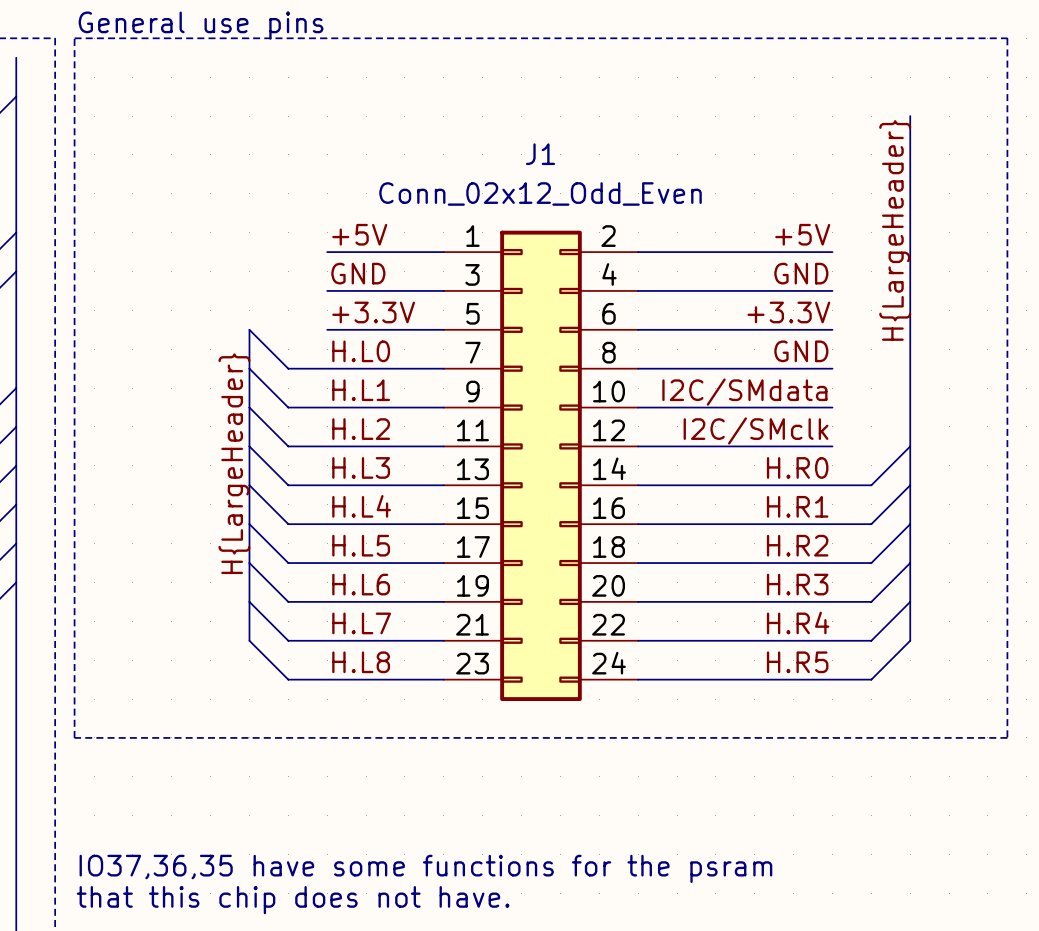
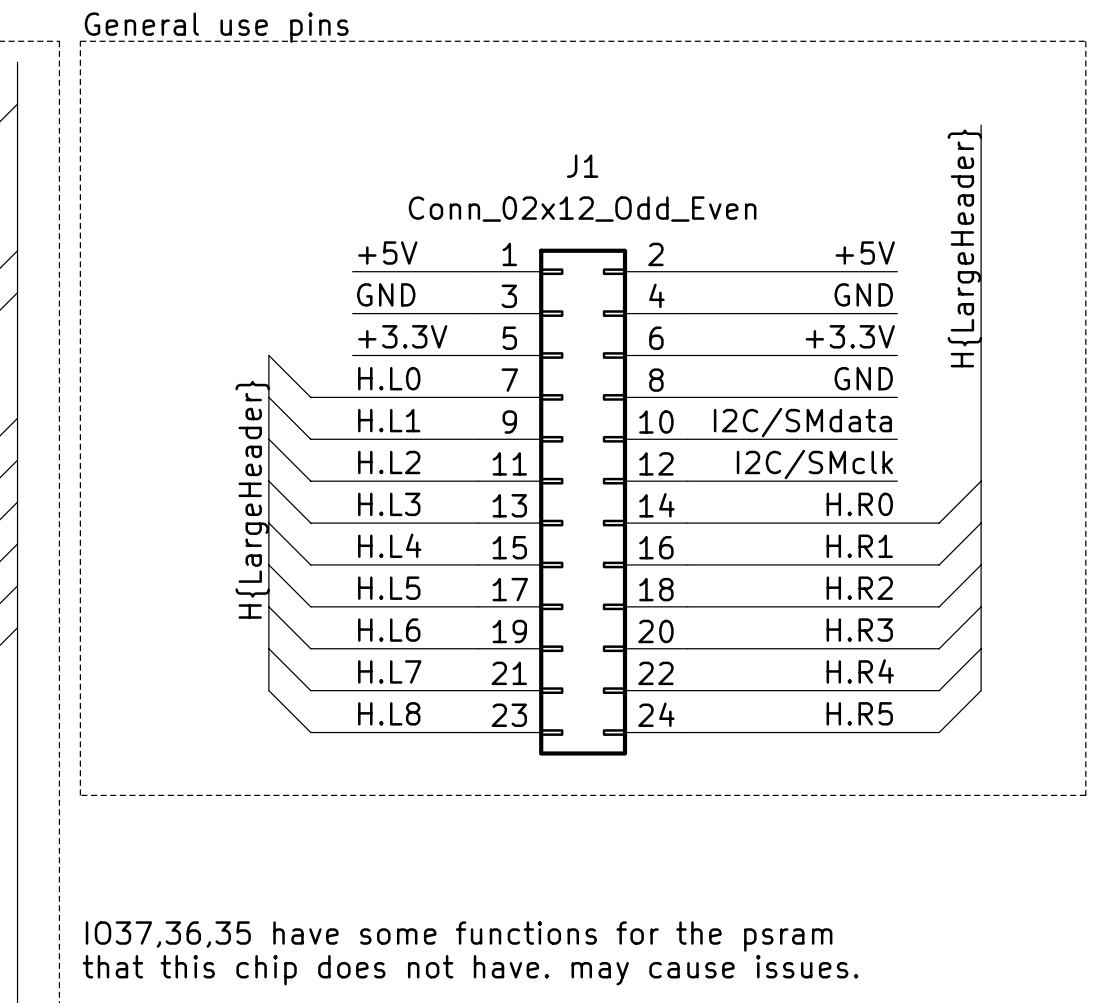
text: that this chip does not have. (293, 900) -> that this chip does not have. may cause issues. (470, 970)

